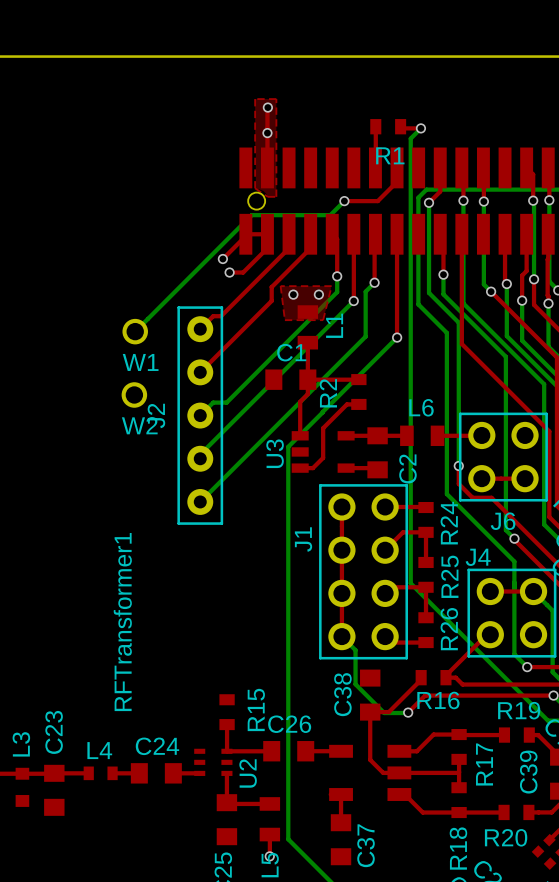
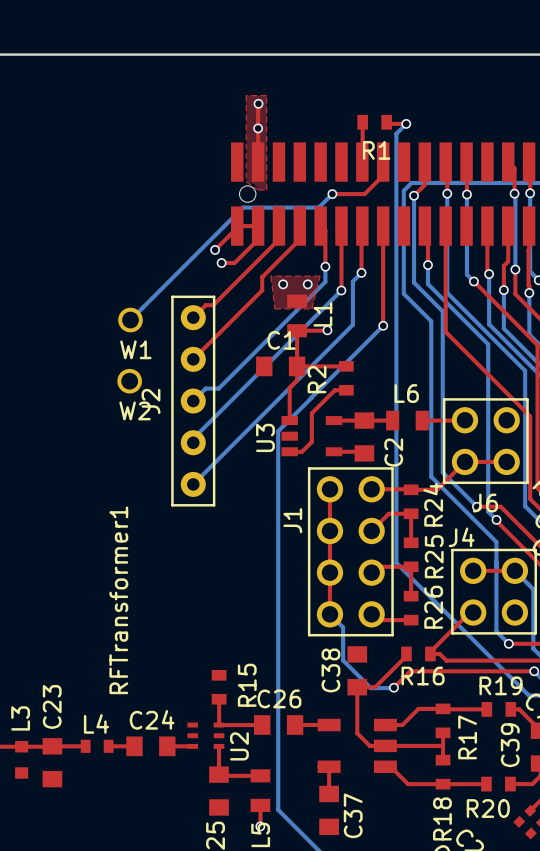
top track: none -> (327, 330) (297, 330)
via: none -> (327, 330)
top track: (458, 465) (458, 483) (472, 497) (491, 497) (518, 525) -> (476, 506) (500, 506)
bottom track: none -> (442, 449) (442, 472) (476, 506)
via position: (458, 465) -> (476, 506)
top track: none -> (465, 461) (437, 489) (411, 489)

